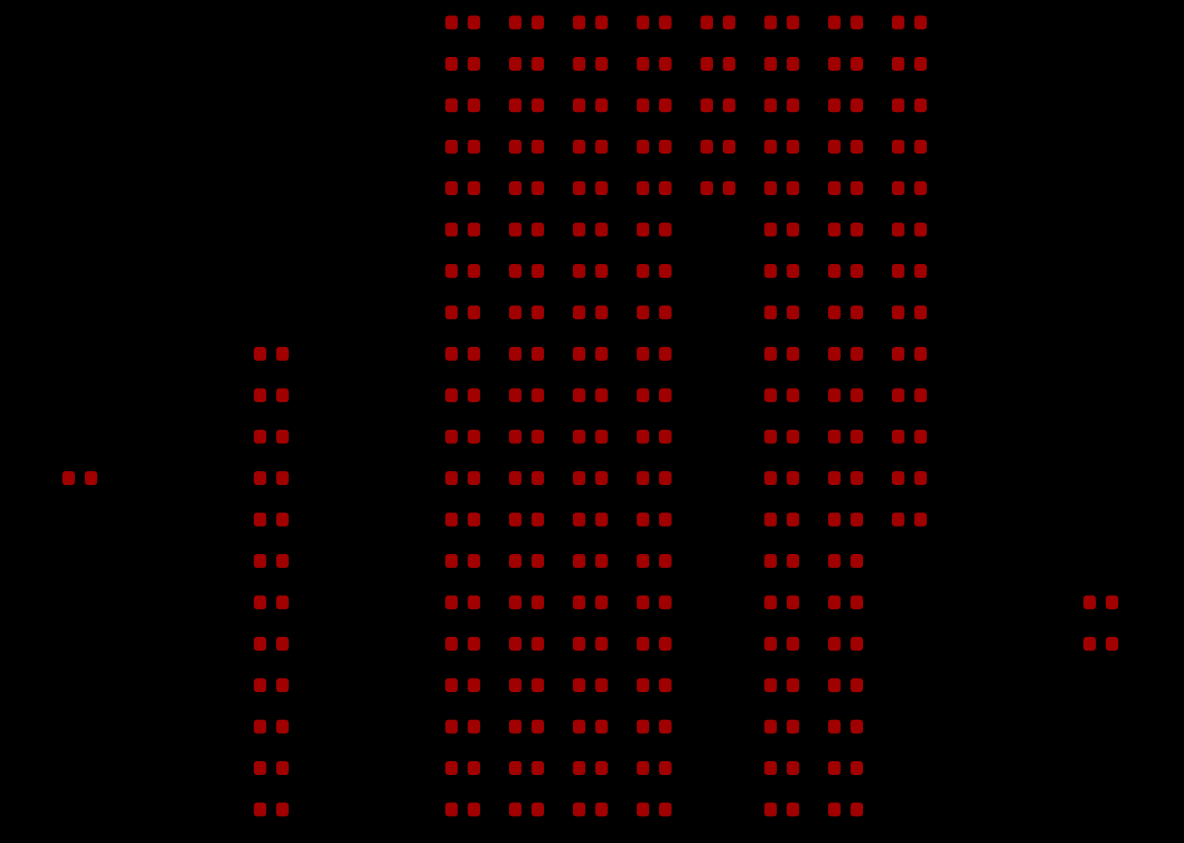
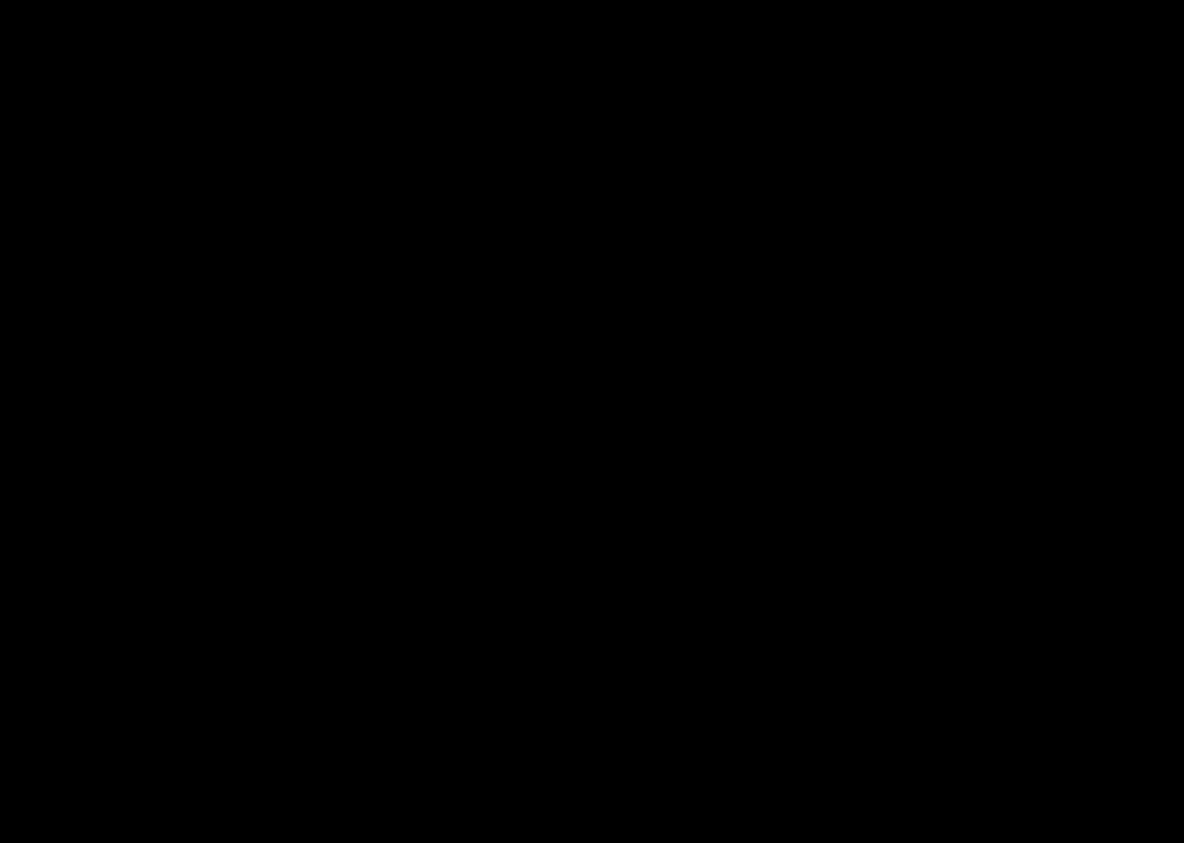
part: (462, 22) -> none
part: (526, 22) -> none
part: (590, 22) -> none
part: (654, 22) -> none
part: (717, 22) -> none
part: (781, 22) -> none
part: (845, 22) -> none
part: (909, 22) -> none
part: (462, 63) -> none
part: (526, 63) -> none
part: (590, 63) -> none
part: (654, 63) -> none
part: (717, 63) -> none
part: (781, 63) -> none
part: (845, 63) -> none
part: (909, 63) -> none
part: (462, 105) -> none
part: (526, 105) -> none
part: (590, 105) -> none
part: (654, 105) -> none
part: (717, 105) -> none
part: (781, 105) -> none
part: (845, 105) -> none
part: (909, 105) -> none
part: (462, 146) -> none
part: (526, 146) -> none
part: (590, 146) -> none
part: (654, 146) -> none
part: (717, 146) -> none
part: (781, 146) -> none
part: (845, 146) -> none
part: (909, 146) -> none
part: (462, 188) -> none
part: (526, 188) -> none
part: (590, 188) -> none
part: (654, 188) -> none
part: (717, 188) -> none
part: (781, 188) -> none
part: (845, 188) -> none
part: (909, 188) -> none
part: (462, 229) -> none
part: (526, 229) -> none
part: (590, 229) -> none
part: (654, 229) -> none
part: (781, 229) -> none
part: (845, 229) -> none
part: (909, 229) -> none
part: (462, 270) -> none
part: (526, 270) -> none
part: (590, 270) -> none
part: (654, 270) -> none
part: (781, 270) -> none
part: (845, 270) -> none
part: (909, 270) -> none
part: (462, 312) -> none
part: (526, 312) -> none
part: (590, 312) -> none
part: (654, 312) -> none
part: (781, 312) -> none
part: (845, 312) -> none
part: (909, 312) -> none
part: (271, 353) -> none
part: (462, 353) -> none
part: (526, 353) -> none
part: (590, 353) -> none
part: (654, 353) -> none
part: (781, 353) -> none
part: (845, 353) -> none
part: (909, 353) -> none
part: (271, 395) -> none
part: (462, 395) -> none
part: (526, 395) -> none
part: (590, 395) -> none
part: (654, 395) -> none
part: (781, 395) -> none
part: (845, 395) -> none
part: (909, 395) -> none
part: (271, 436) -> none
part: (462, 436) -> none
part: (526, 436) -> none
part: (590, 436) -> none
part: (654, 436) -> none
part: (781, 436) -> none
part: (845, 436) -> none
part: (909, 436) -> none
part: (79, 478) -> none
part: (271, 478) -> none
part: (462, 478) -> none
part: (526, 478) -> none
part: (590, 478) -> none
part: (654, 478) -> none
part: (781, 478) -> none
part: (845, 478) -> none
part: (909, 478) -> none
part: (271, 519) -> none
part: (462, 519) -> none
part: (526, 519) -> none
part: (590, 519) -> none
part: (654, 519) -> none
part: (781, 519) -> none
part: (845, 519) -> none
part: (909, 519) -> none
part: (271, 560) -> none
part: (462, 560) -> none
part: (526, 560) -> none
part: (590, 560) -> none
part: (654, 560) -> none
part: (781, 560) -> none
part: (845, 560) -> none
part: (271, 602) -> none
part: (462, 602) -> none
part: (526, 602) -> none
part: (590, 602) -> none
part: (654, 602) -> none
part: (781, 602) -> none
part: (845, 602) -> none
part: (1100, 602) -> none
part: (271, 643) -> none
part: (462, 643) -> none
part: (526, 643) -> none
part: (590, 643) -> none
part: (654, 643) -> none
part: (781, 643) -> none
part: (845, 643) -> none
part: (1100, 643) -> none
part: (271, 685) -> none
part: (462, 685) -> none
part: (526, 685) -> none
part: (590, 685) -> none
part: (654, 685) -> none
part: (781, 685) -> none
part: (845, 685) -> none
part: (271, 726) -> none
part: (462, 726) -> none
part: (526, 726) -> none
part: (590, 726) -> none
part: (654, 726) -> none
part: (781, 726) -> none
part: (845, 726) -> none
part: (271, 768) -> none
part: (462, 768) -> none
part: (526, 768) -> none
part: (590, 768) -> none
part: (654, 768) -> none
part: (781, 768) -> none
part: (845, 768) -> none
part: (271, 809) -> none
part: (462, 809) -> none
part: (526, 809) -> none
part: (590, 809) -> none
part: (654, 809) -> none
part: (781, 809) -> none
part: (845, 809) -> none

